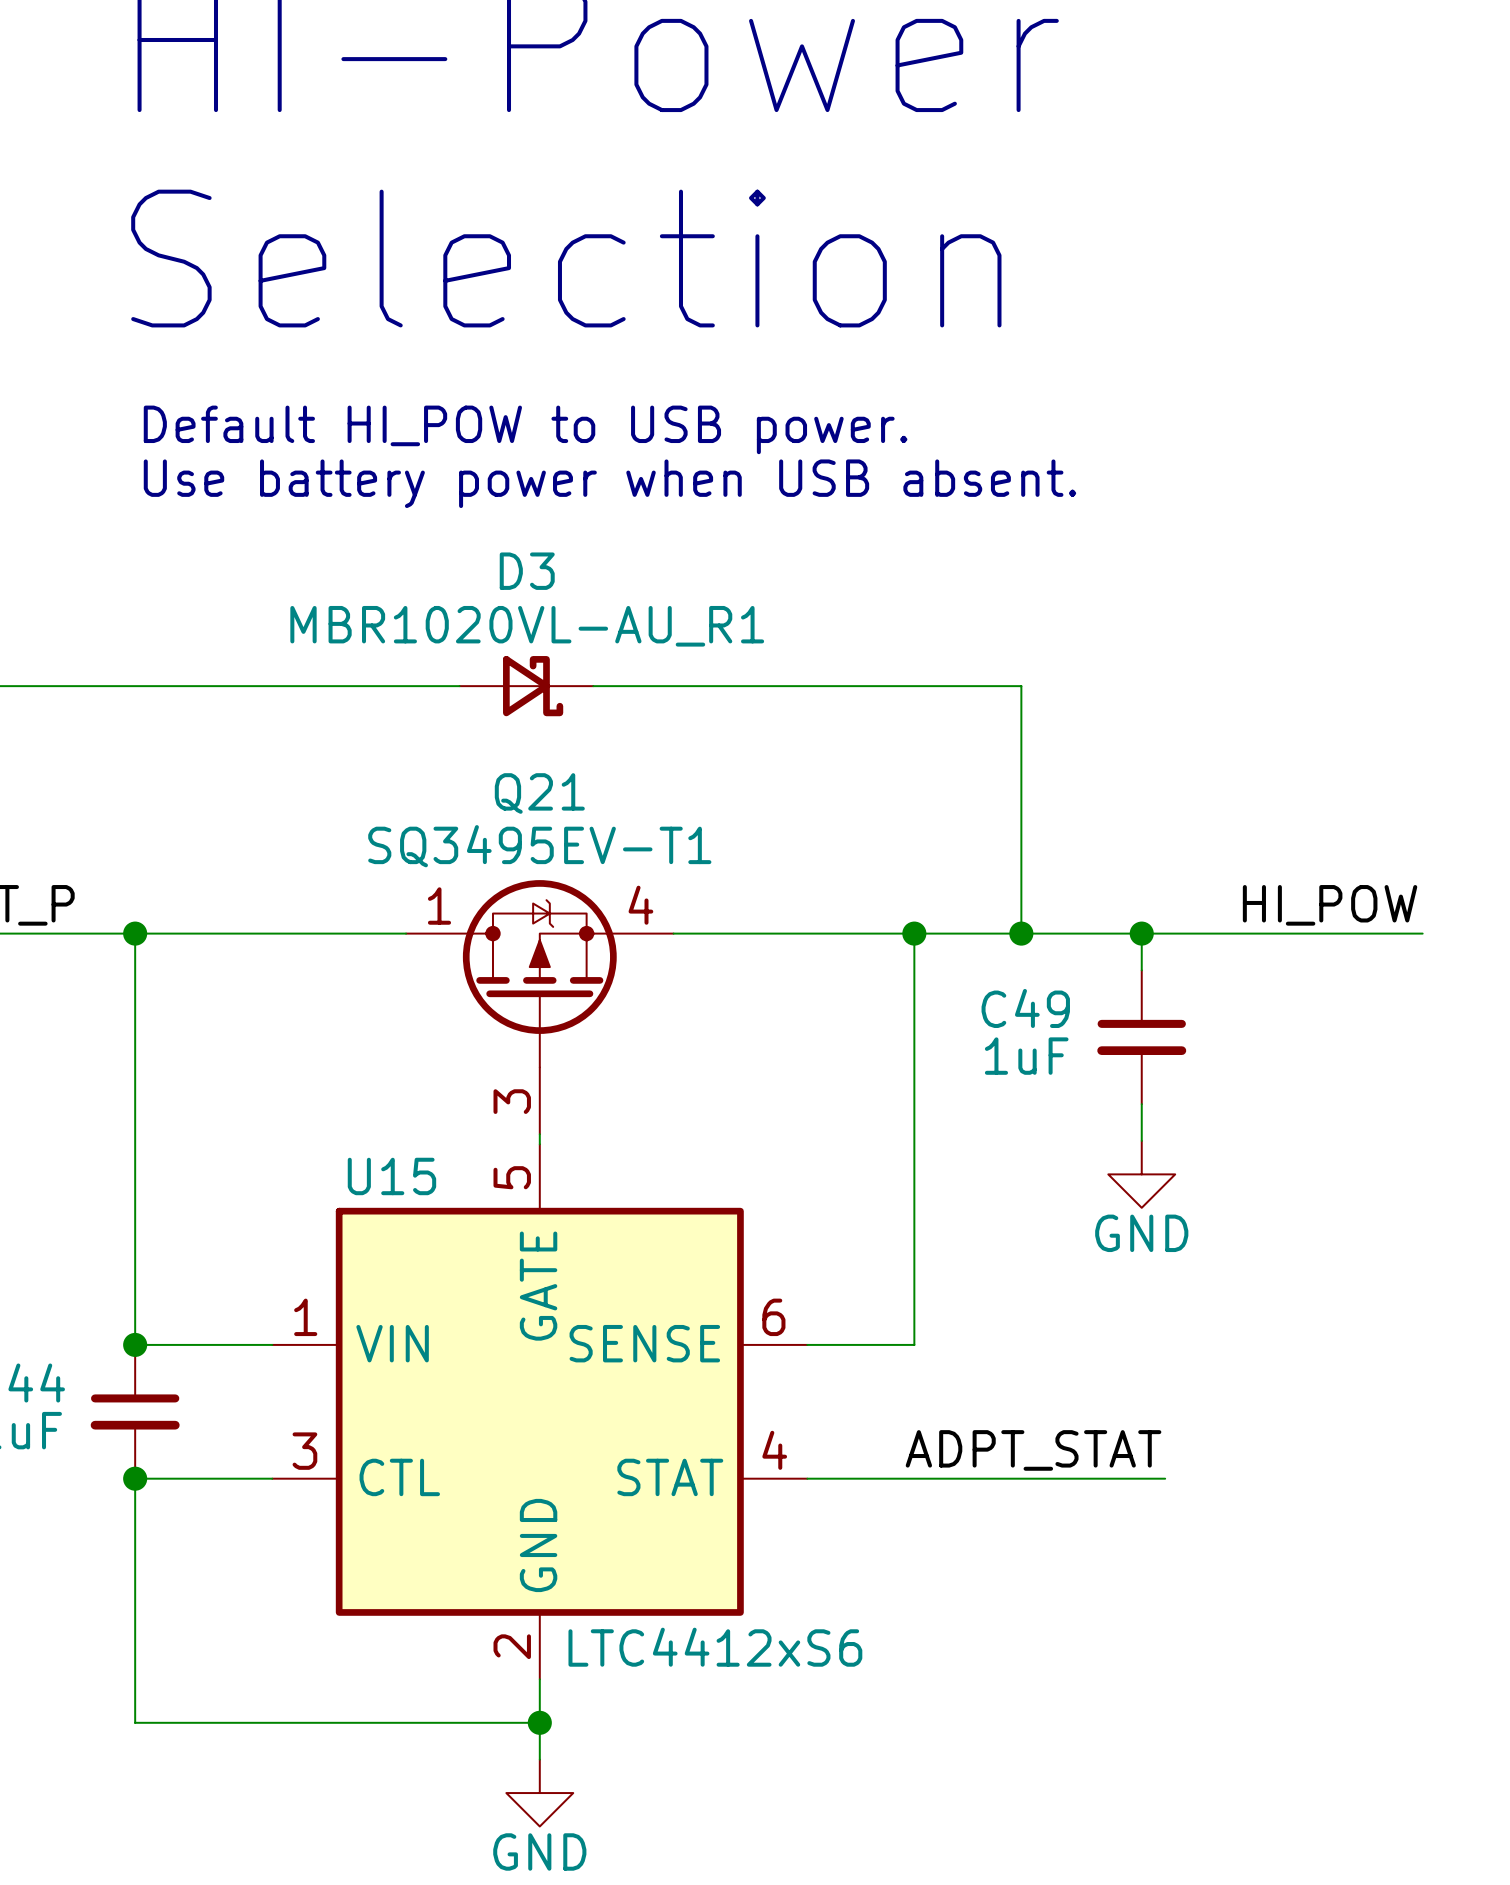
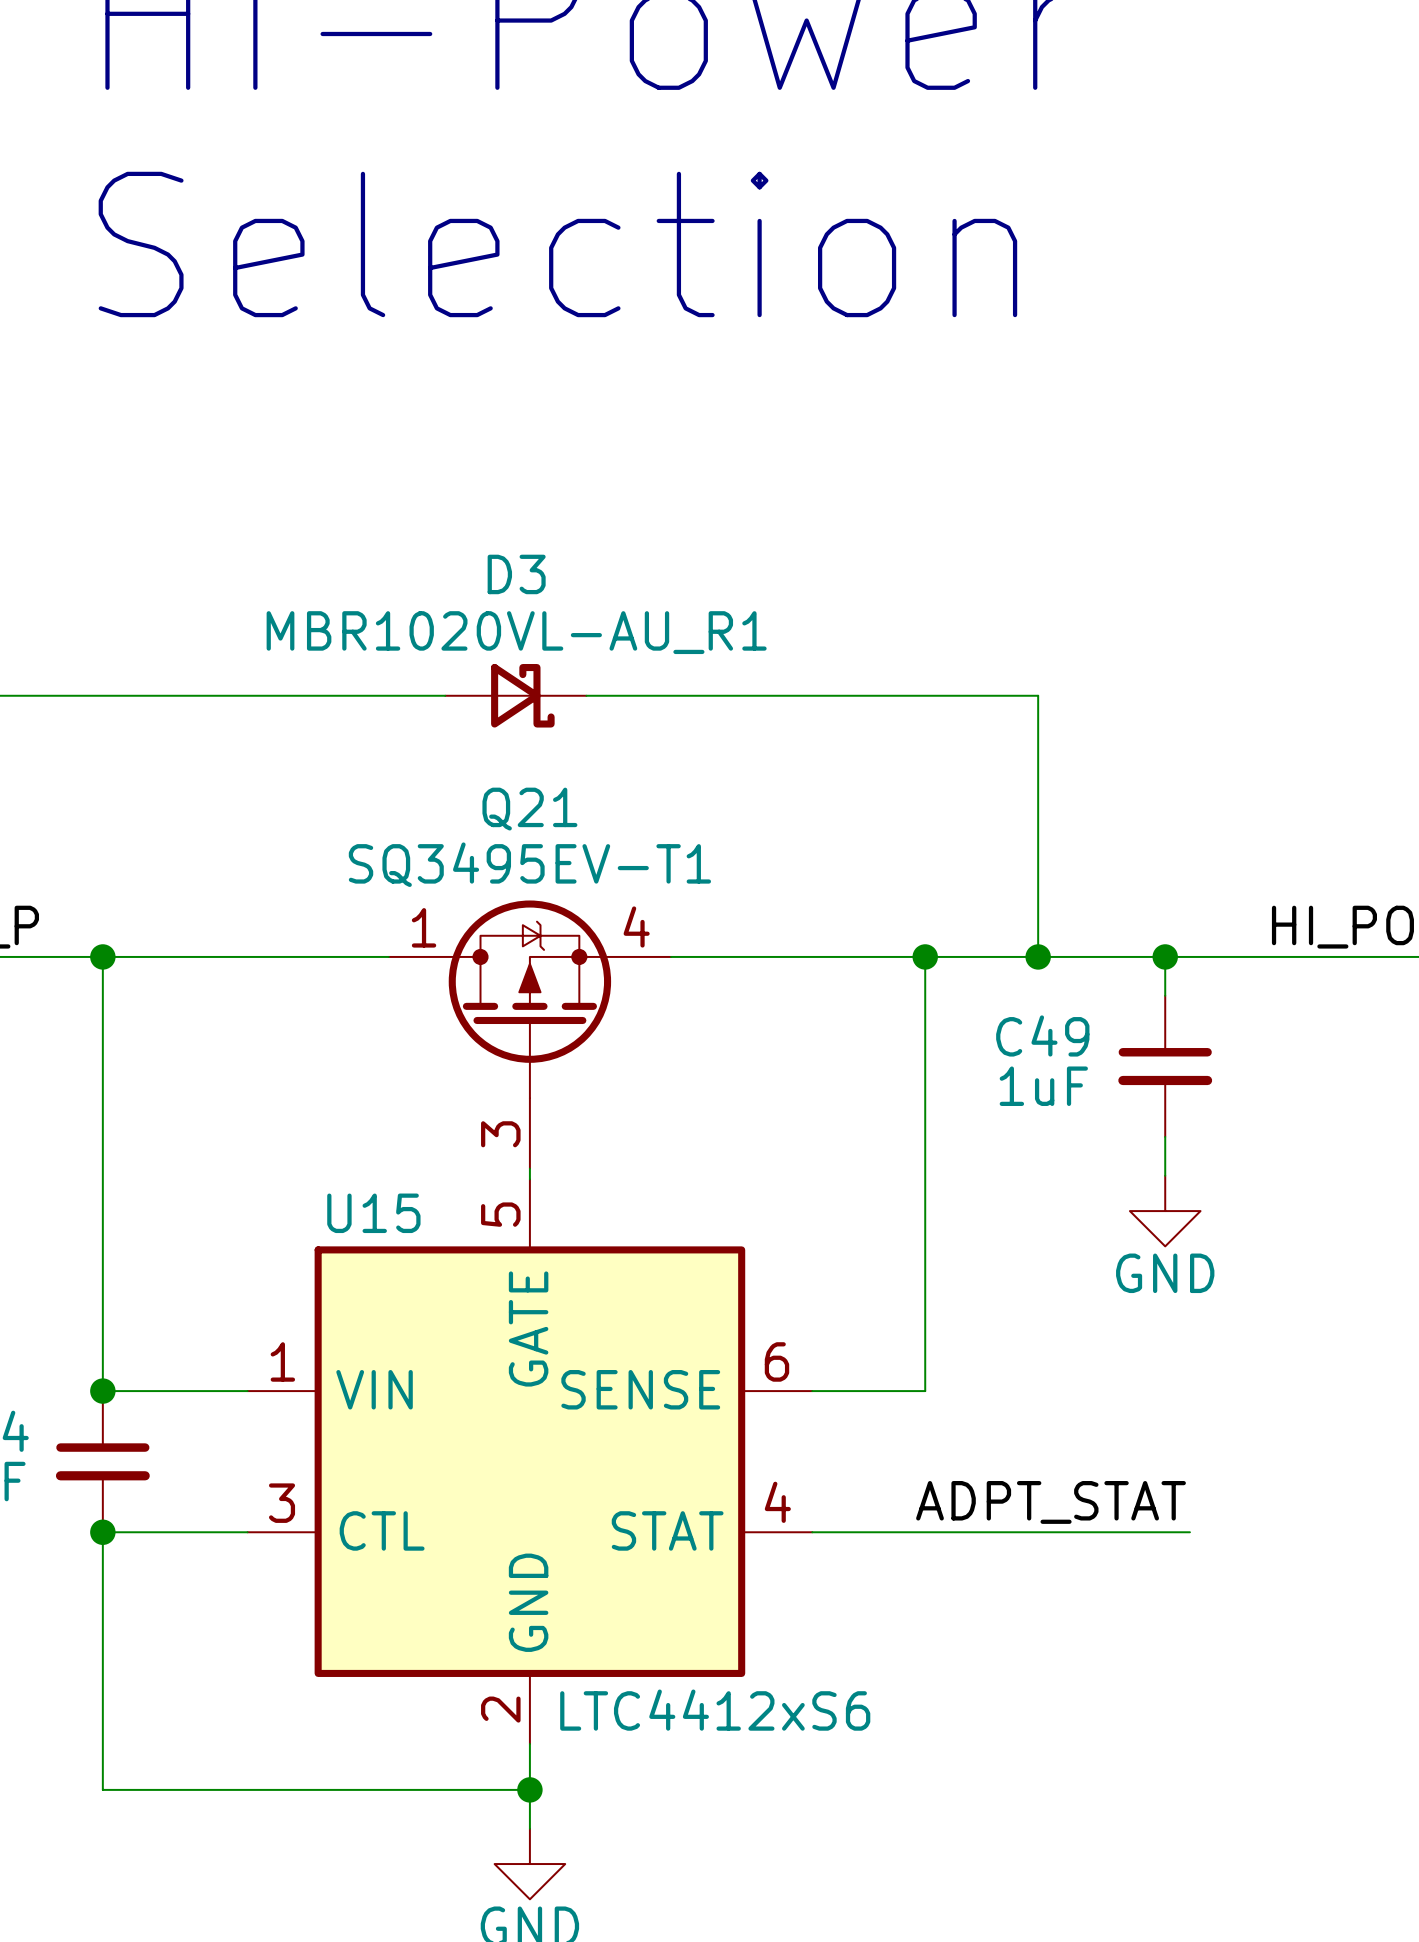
text: Default HI_POW to USB power. (525, 429) -> none
text: Use battery power when USB absent. (609, 483) -> none

